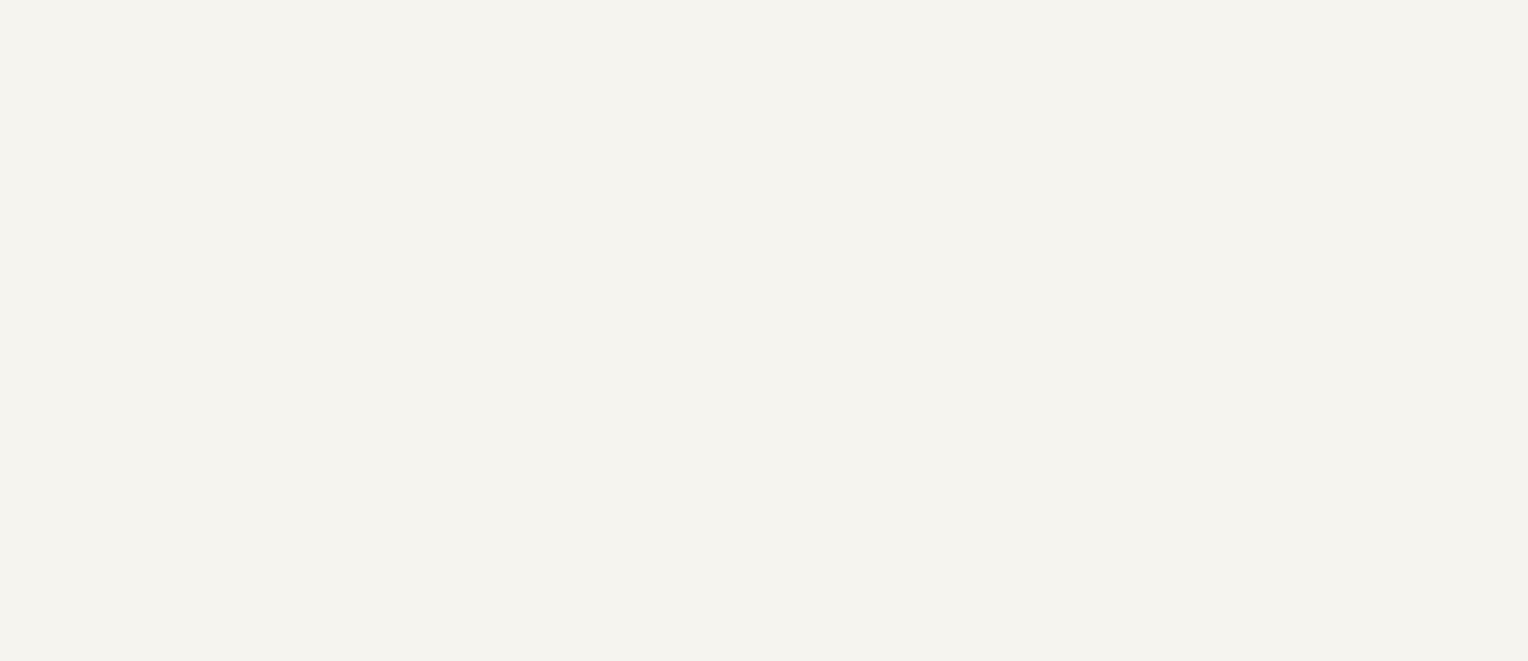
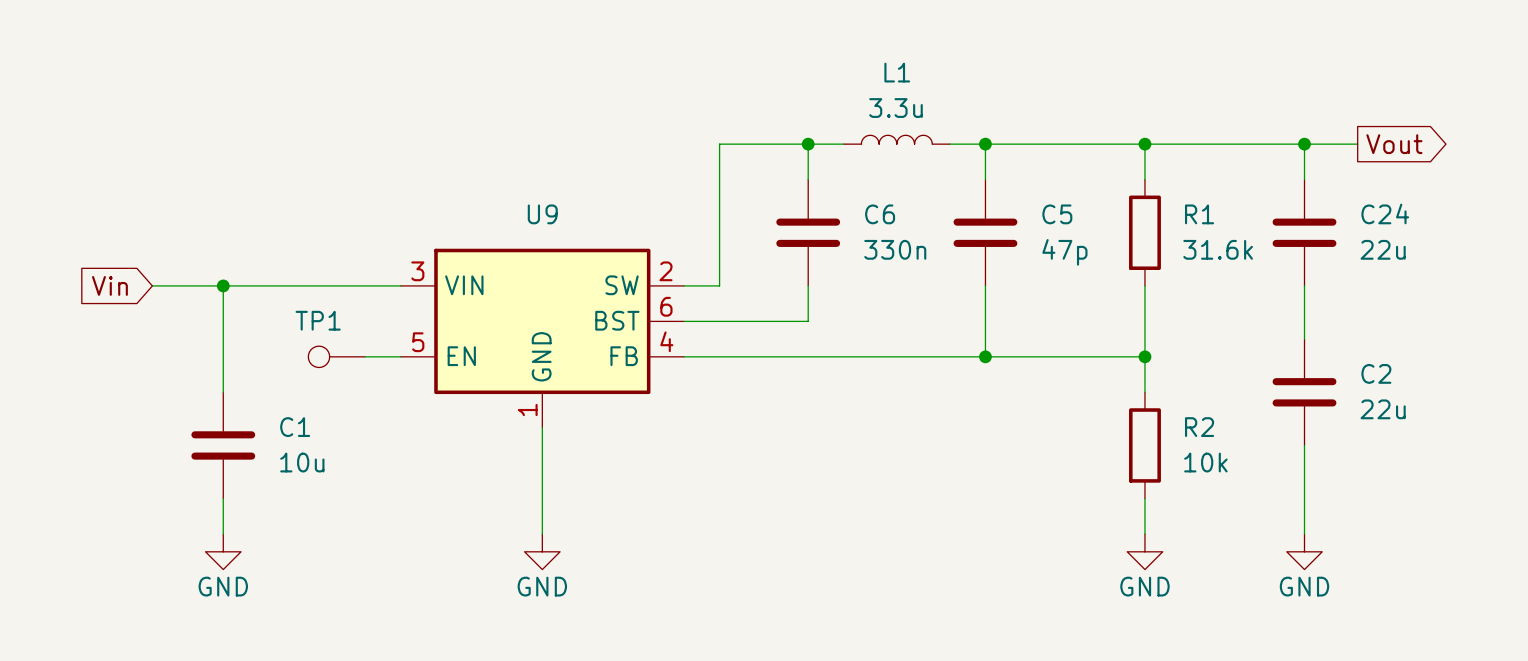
L1: none -> 3.3u (896, 139)
wire: none -> (808, 144) (808, 179)
junction: none -> (808, 144)
wire: none -> (843, 144) (719, 144) (719, 285) (684, 285)
wire: none -> (950, 144) (1357, 144)
wire: none -> (985, 144) (985, 179)
junction: none -> (985, 144)
wire: none -> (1144, 144) (1144, 179)
junction: none -> (1144, 144)
wire: none -> (1304, 144) (1304, 179)
junction: none -> (1304, 144)
global label: none -> Vout (1394, 144)
C6: none -> 330n (808, 232)
C5: none -> 47p (985, 232)
R1: none -> 31.6k (1144, 232)
C24: none -> 22u (1304, 232)
global label: none -> Vin (109, 285)
wire: none -> (152, 285) (400, 285)
wire: none -> (223, 285) (223, 392)
junction: none -> (223, 285)
wire: none -> (808, 285) (808, 321) (684, 321)
wire: none -> (985, 285) (985, 356)
wire: none -> (1144, 285) (1144, 392)
wire: none -> (1304, 285) (1304, 339)
U9: none -> (542, 338)
part: none -> TP1 (336, 356)
wire: none -> (365, 356) (400, 356)
wire: none -> (684, 356) (1144, 356)
junction: none -> (985, 356)
junction: none -> (1144, 356)
C2: none -> 22u (1304, 392)
wire: none -> (542, 427) (542, 534)
C1: none -> 10u (223, 445)
R2: none -> 10k (1144, 445)
wire: none -> (1304, 445) (1304, 534)
wire: none -> (223, 498) (223, 534)
wire: none -> (1144, 498) (1144, 534)
power symbol: none -> GND (223, 551)
power symbol: none -> GND (542, 551)
power symbol: none -> GND (1144, 551)
power symbol: none -> GND (1304, 551)

